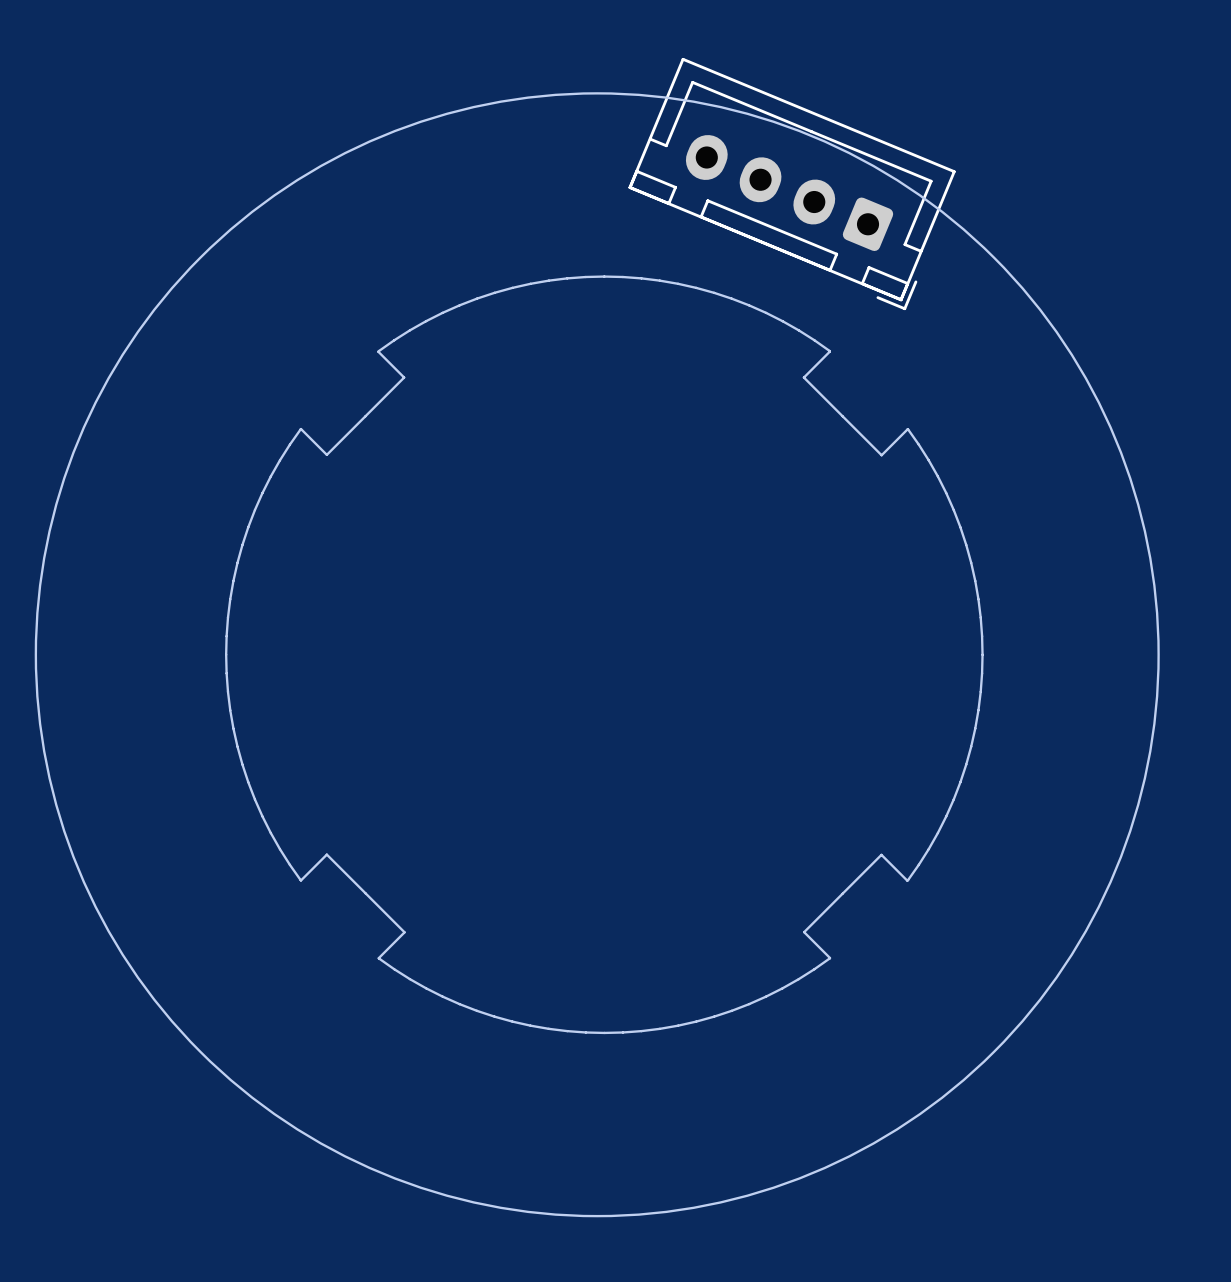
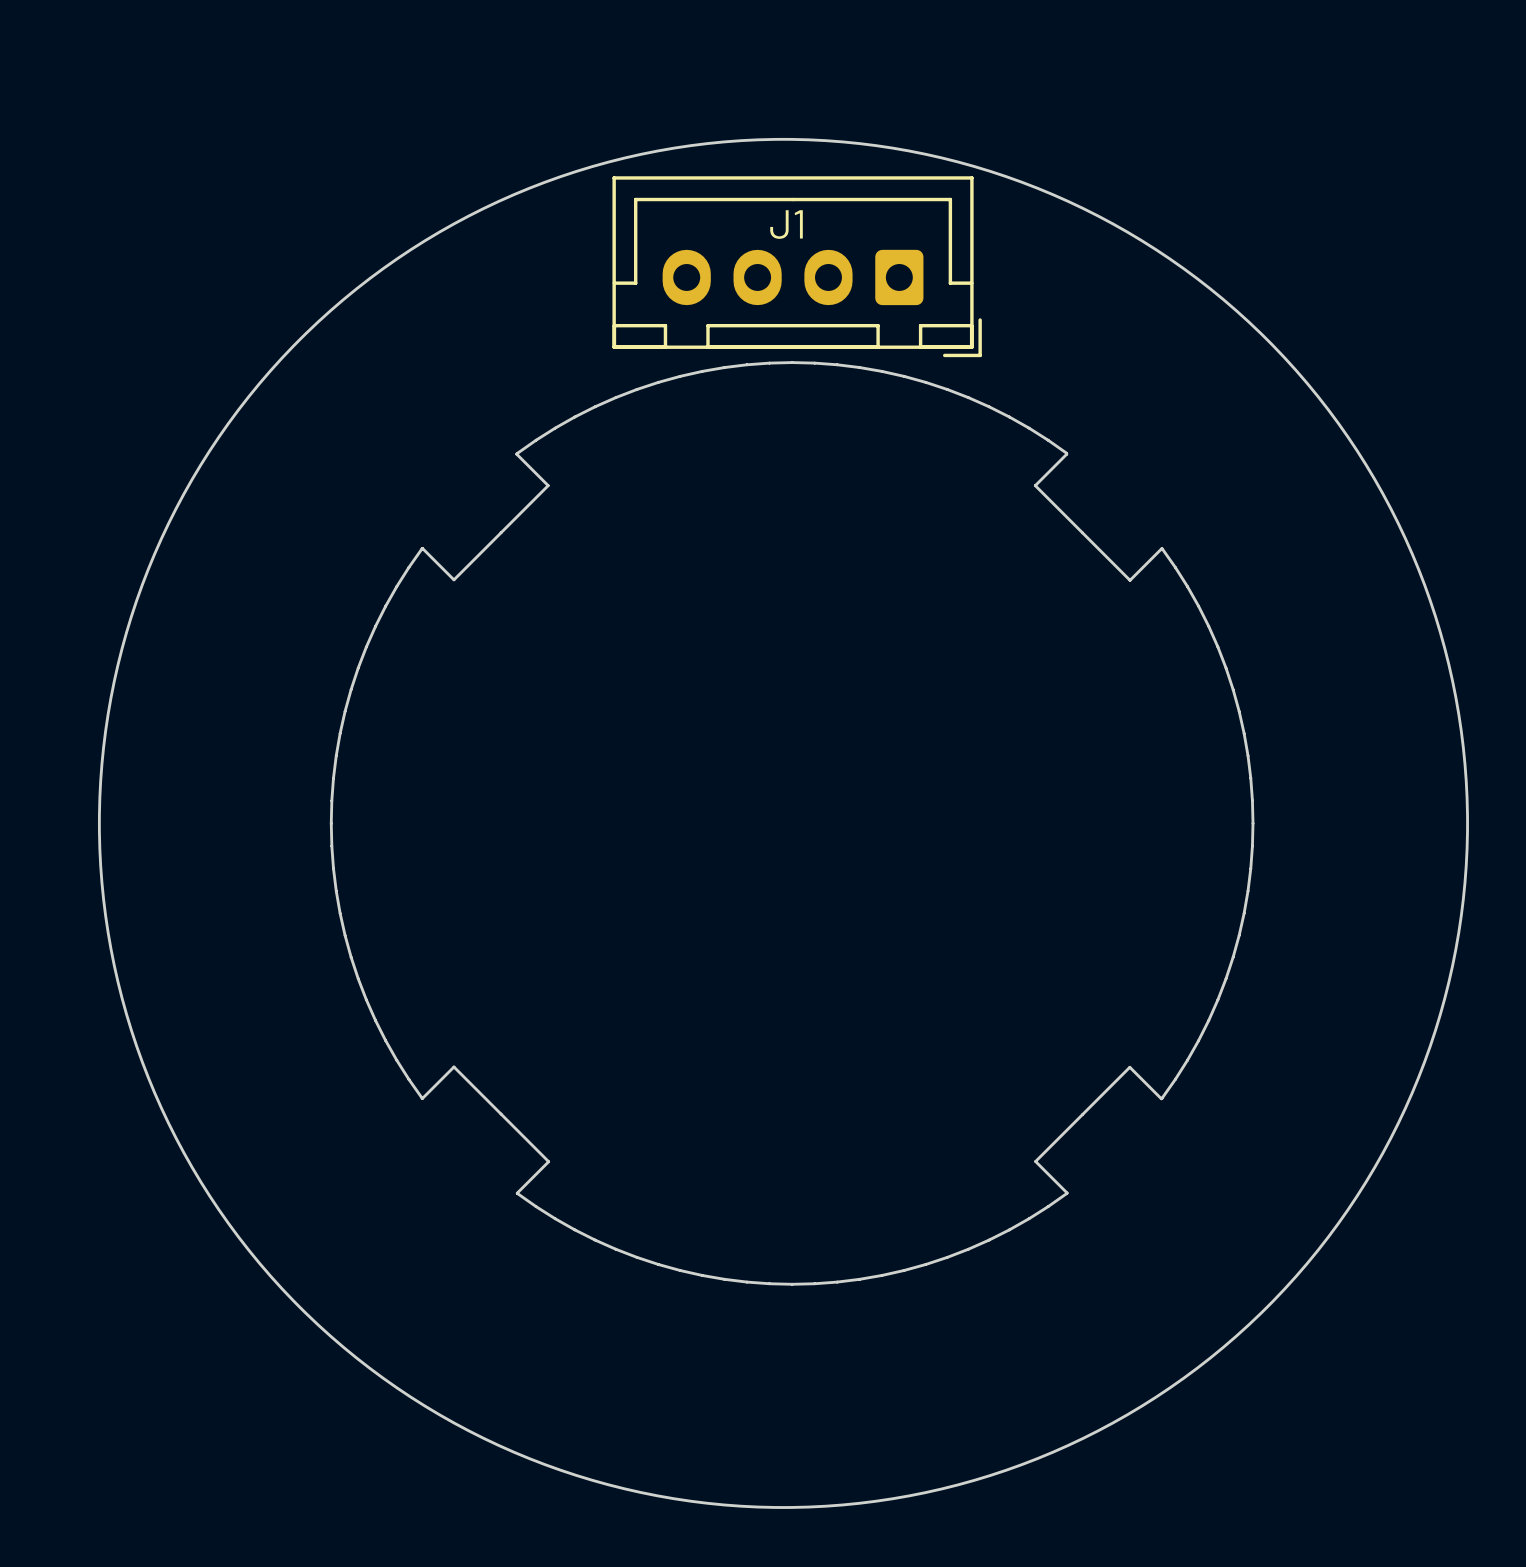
part: (792, 184) -> none
J1: none -> (797, 266)

